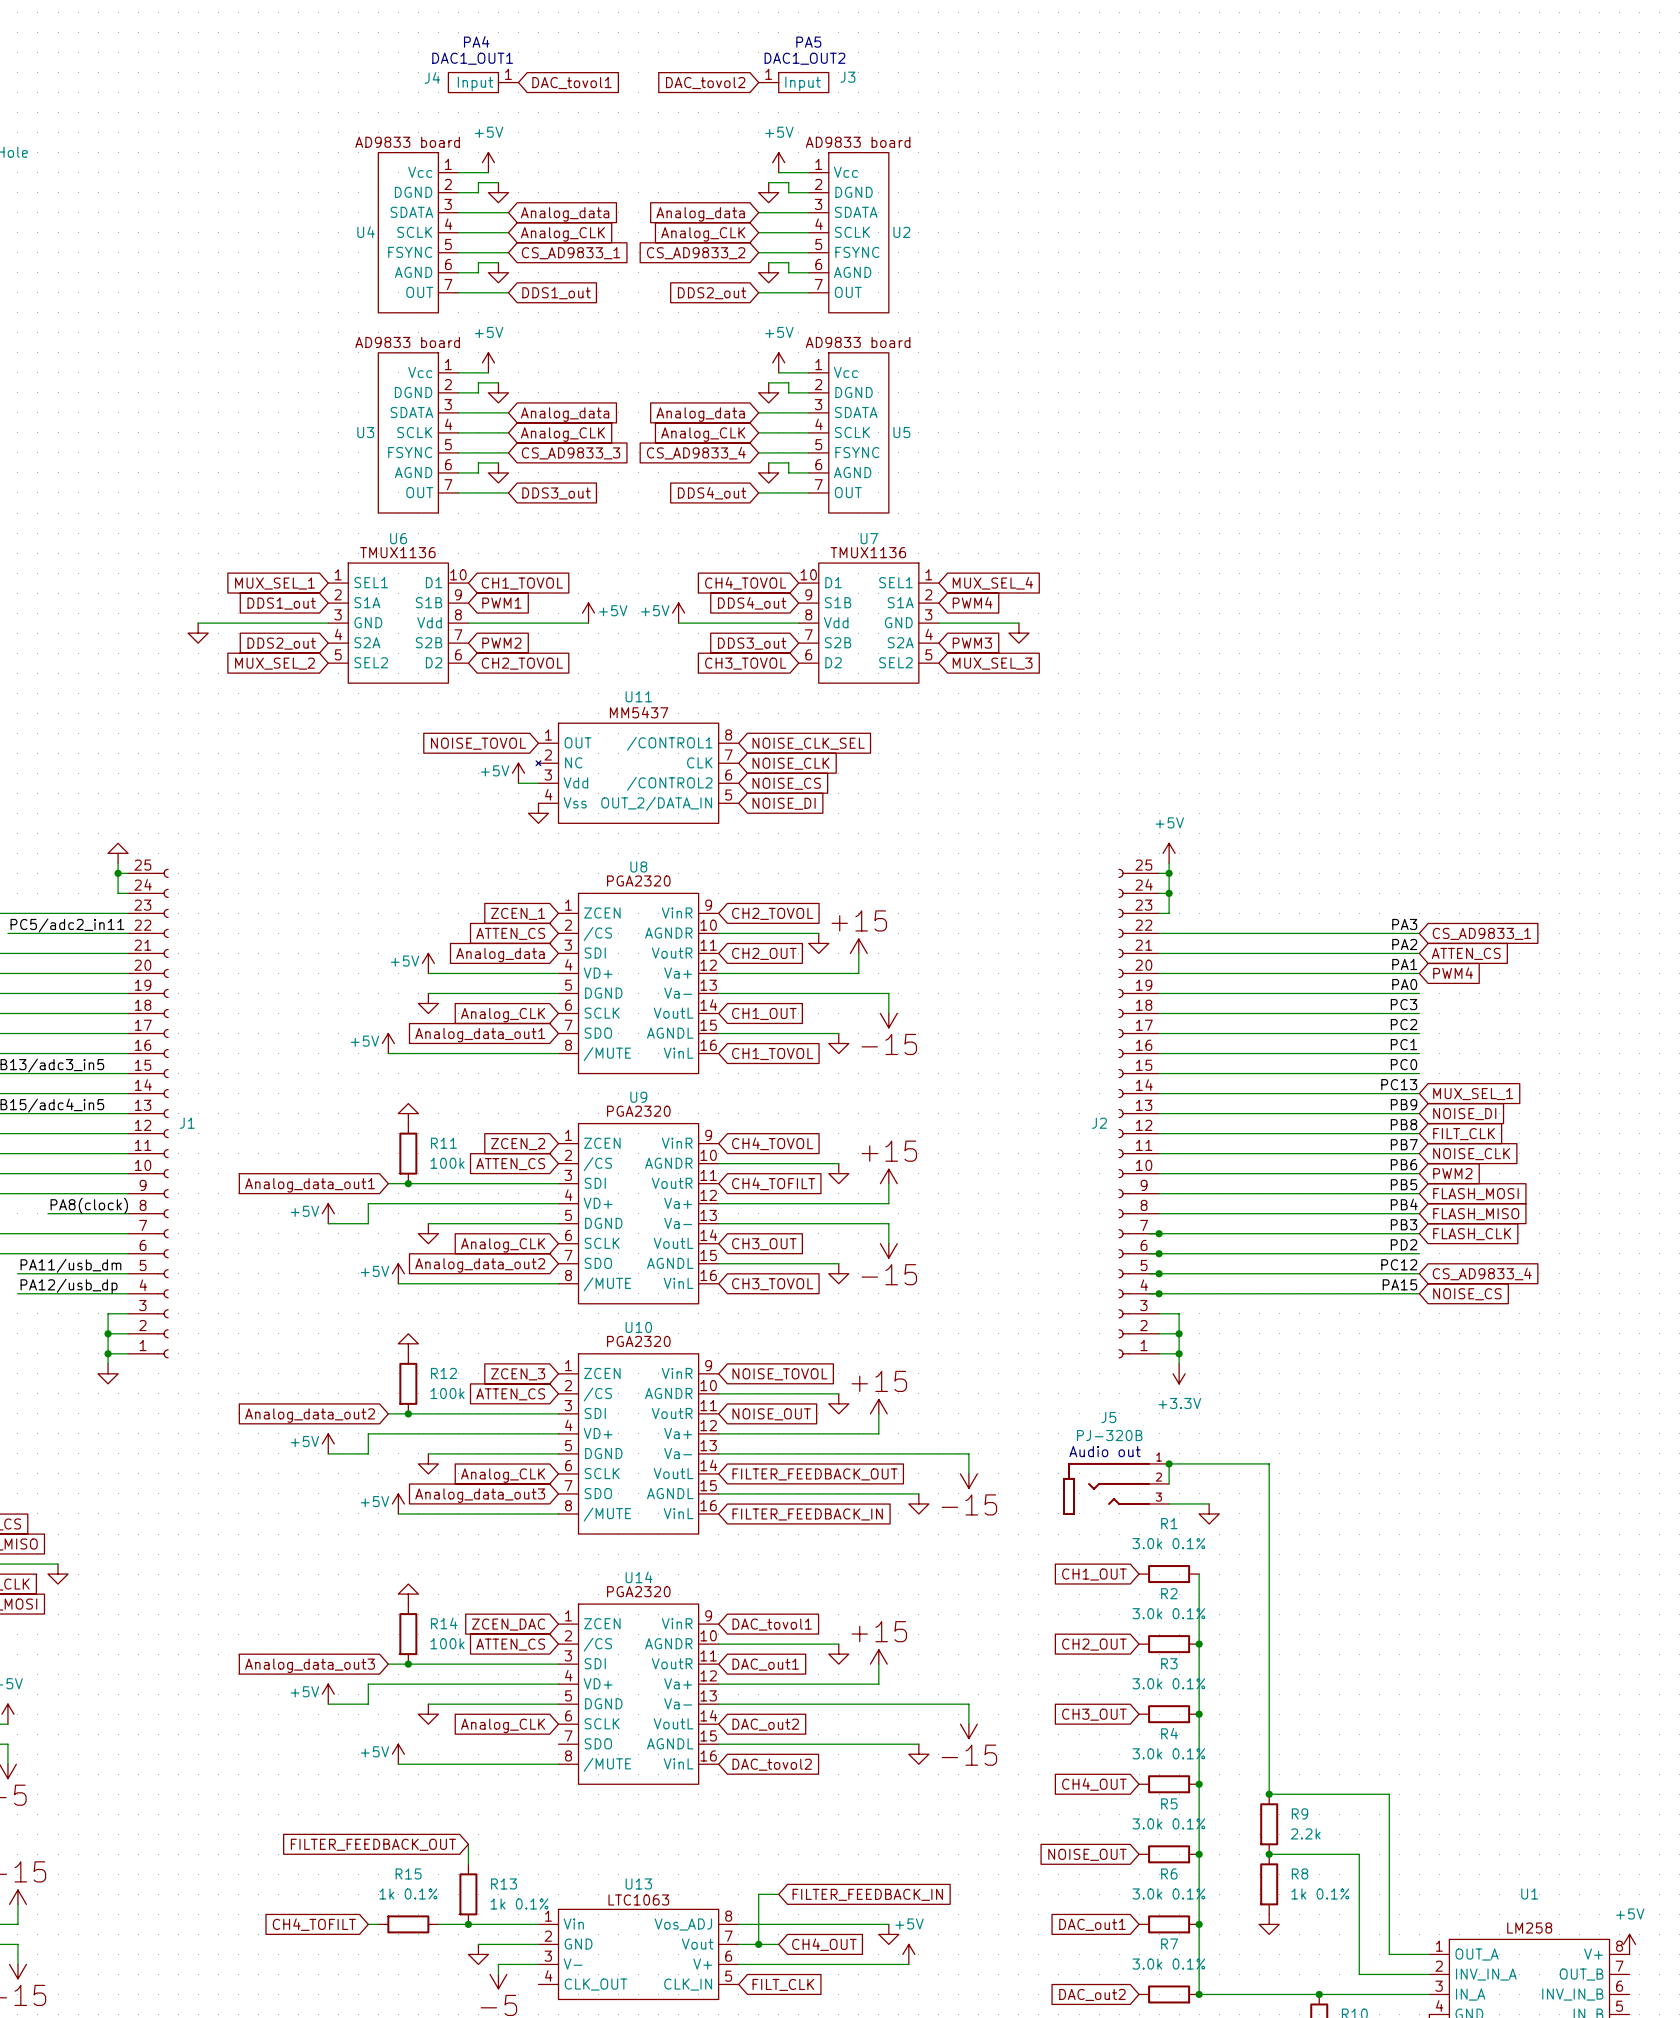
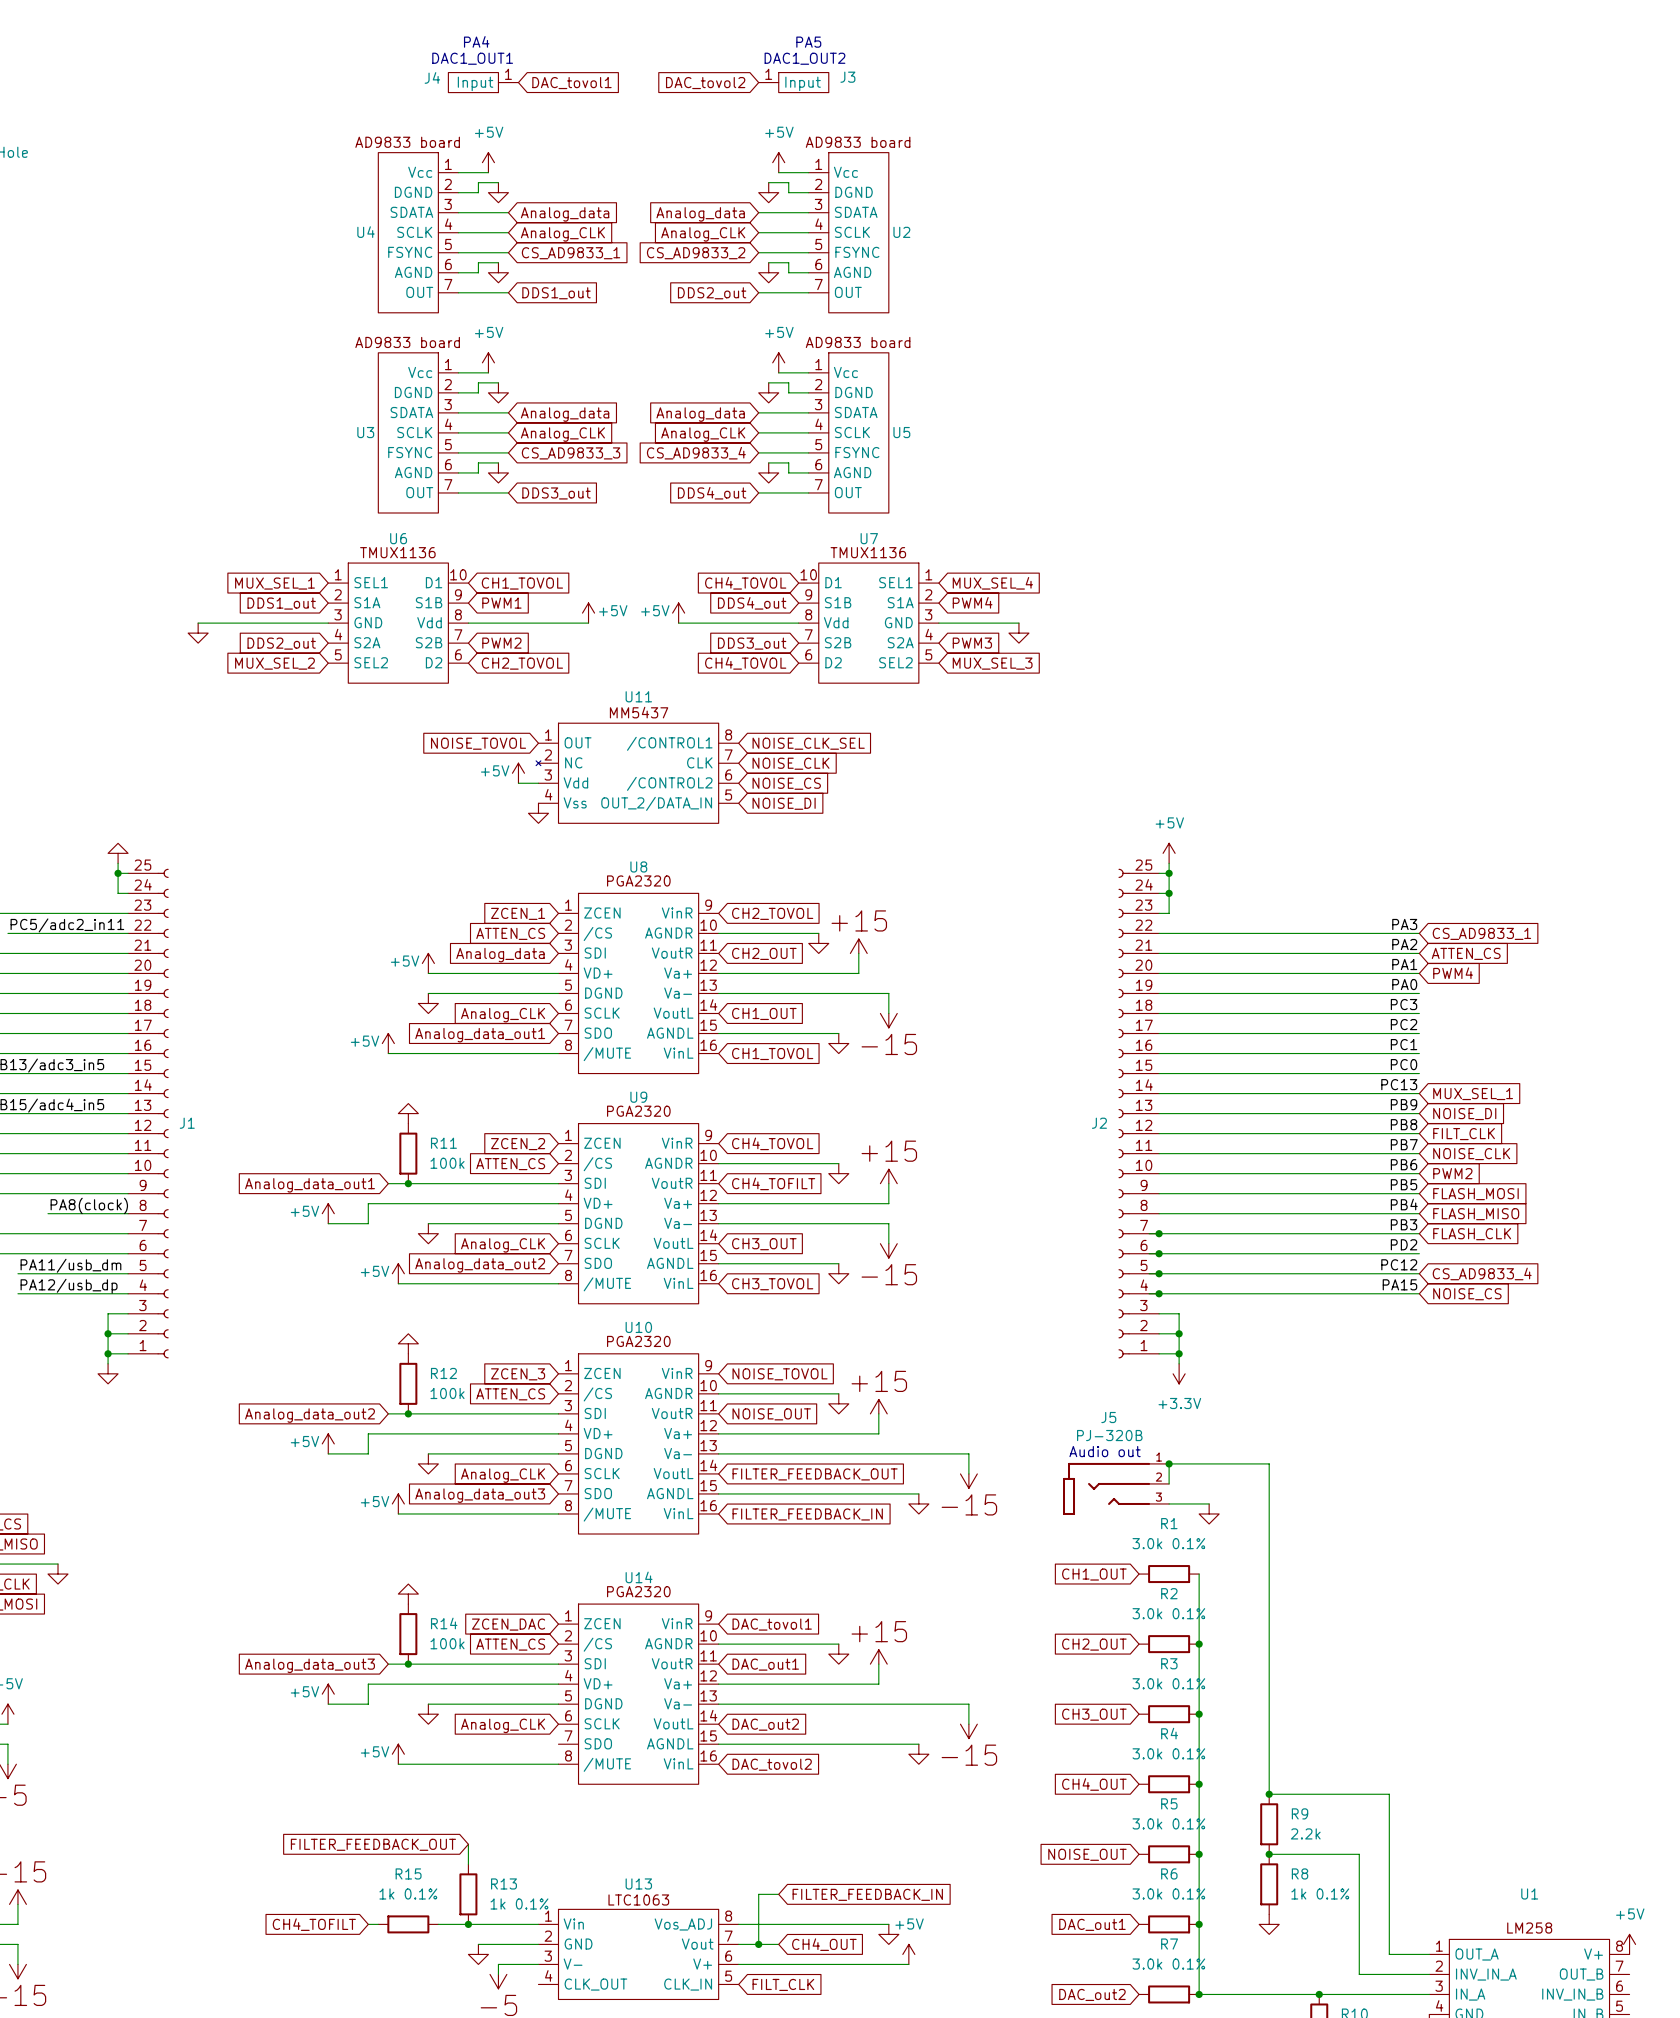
global label: CH3_TOVOL (745, 663) -> CH4_TOVOL (745, 663)

